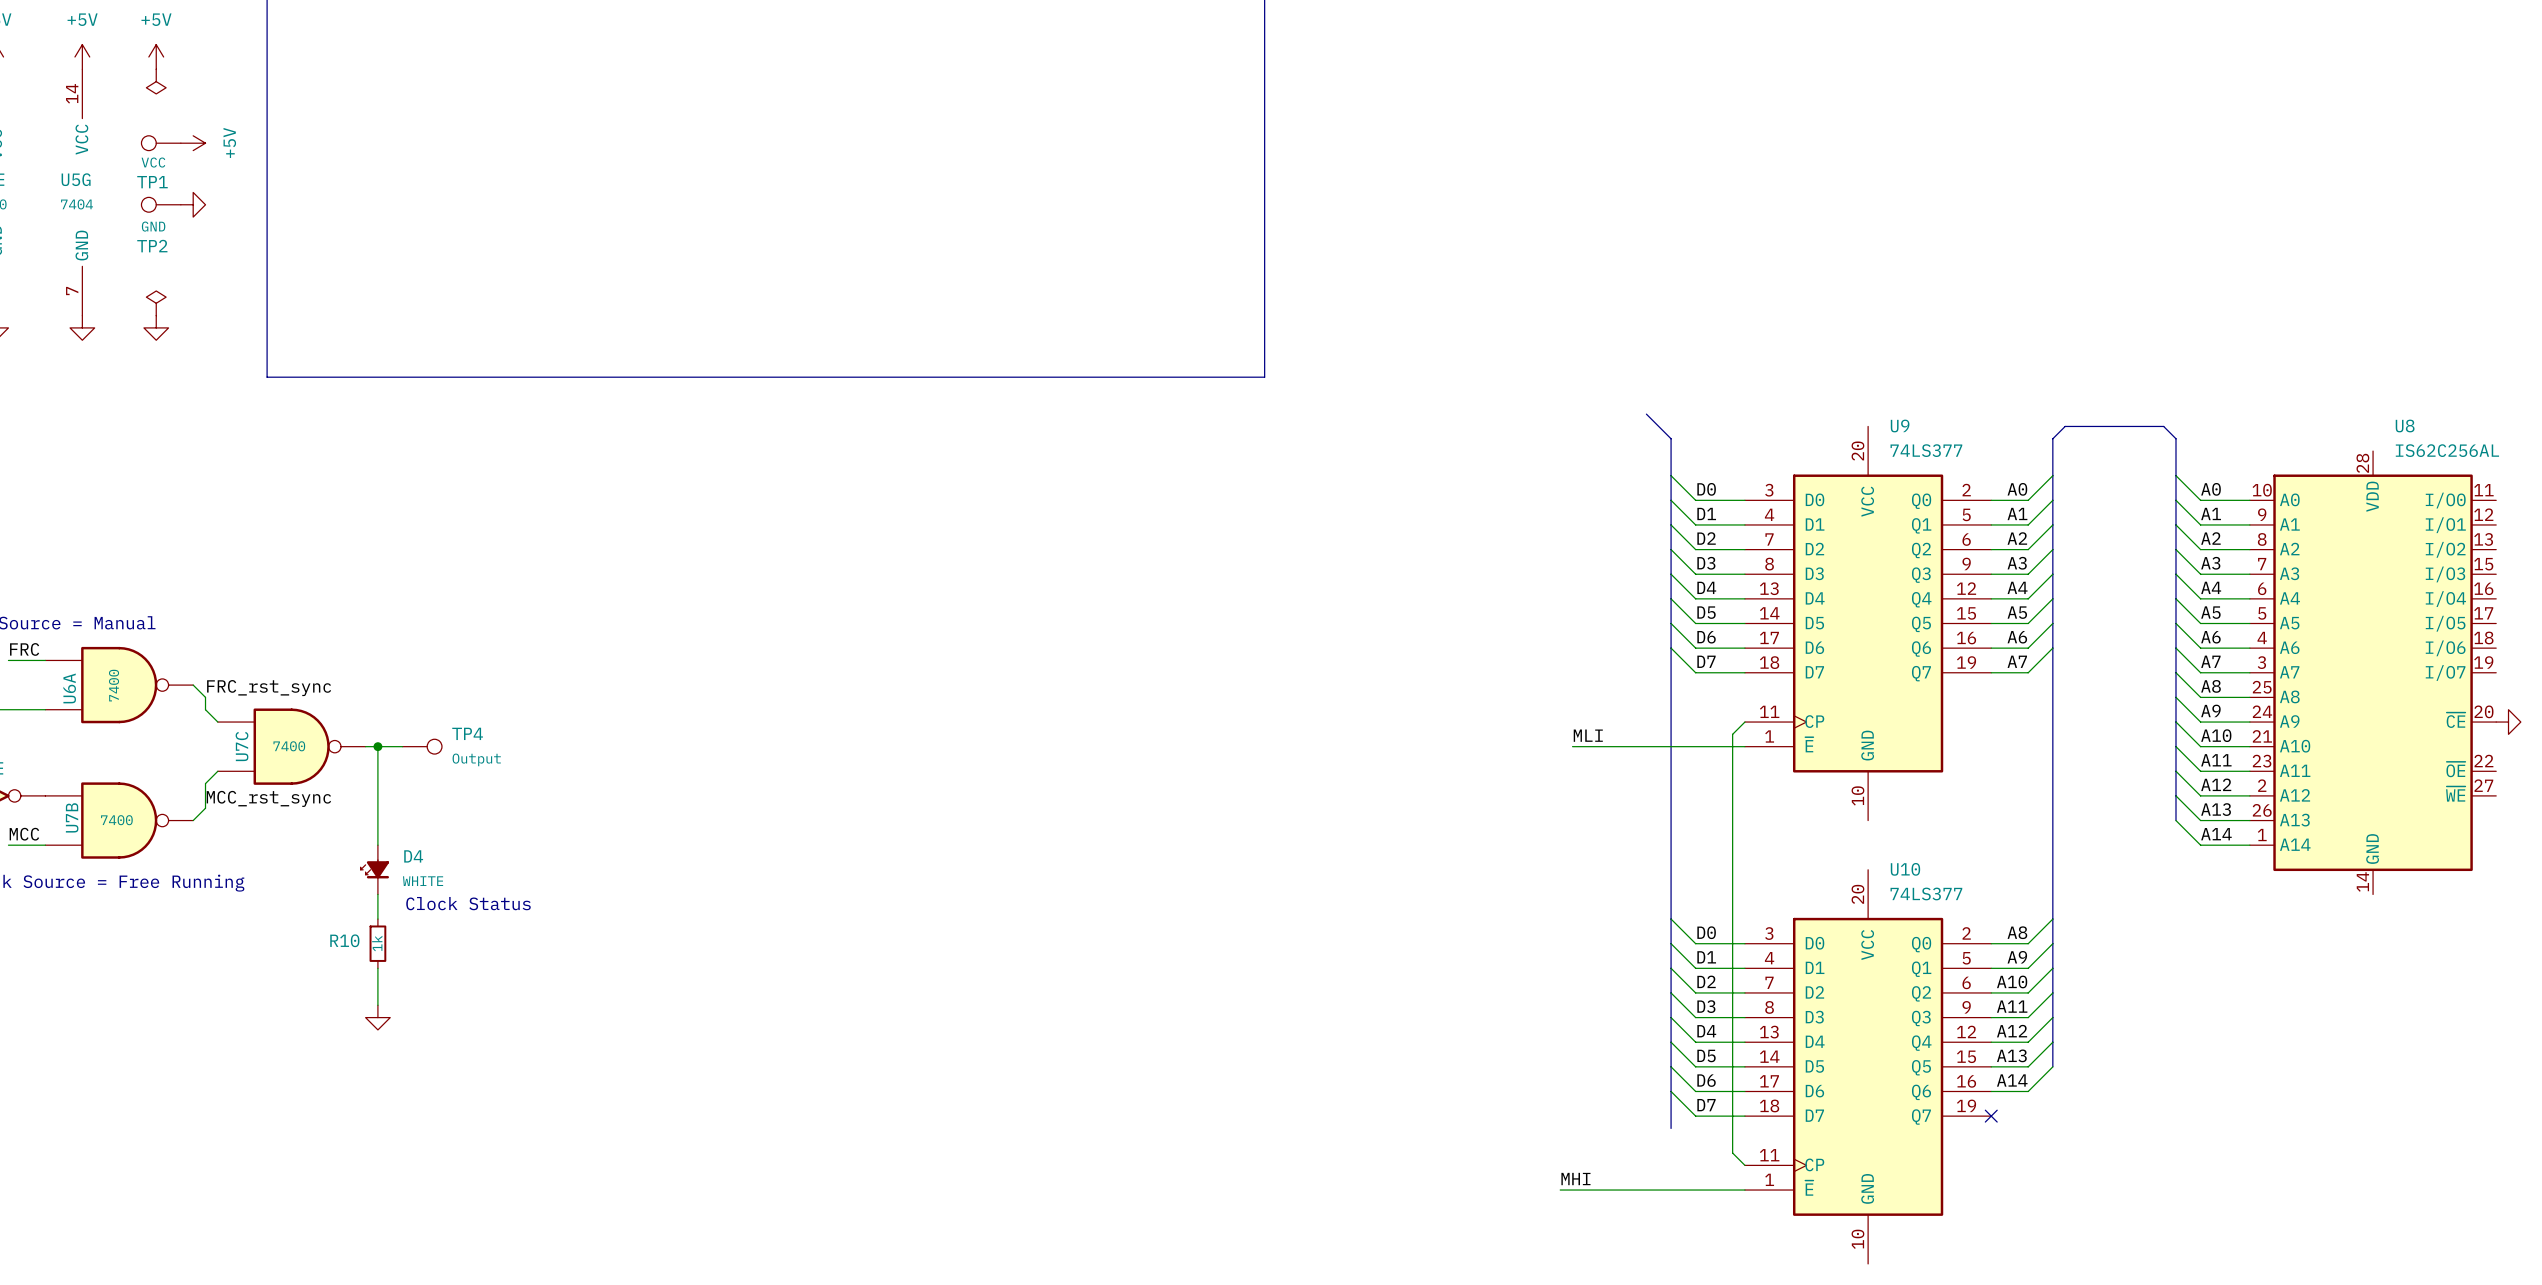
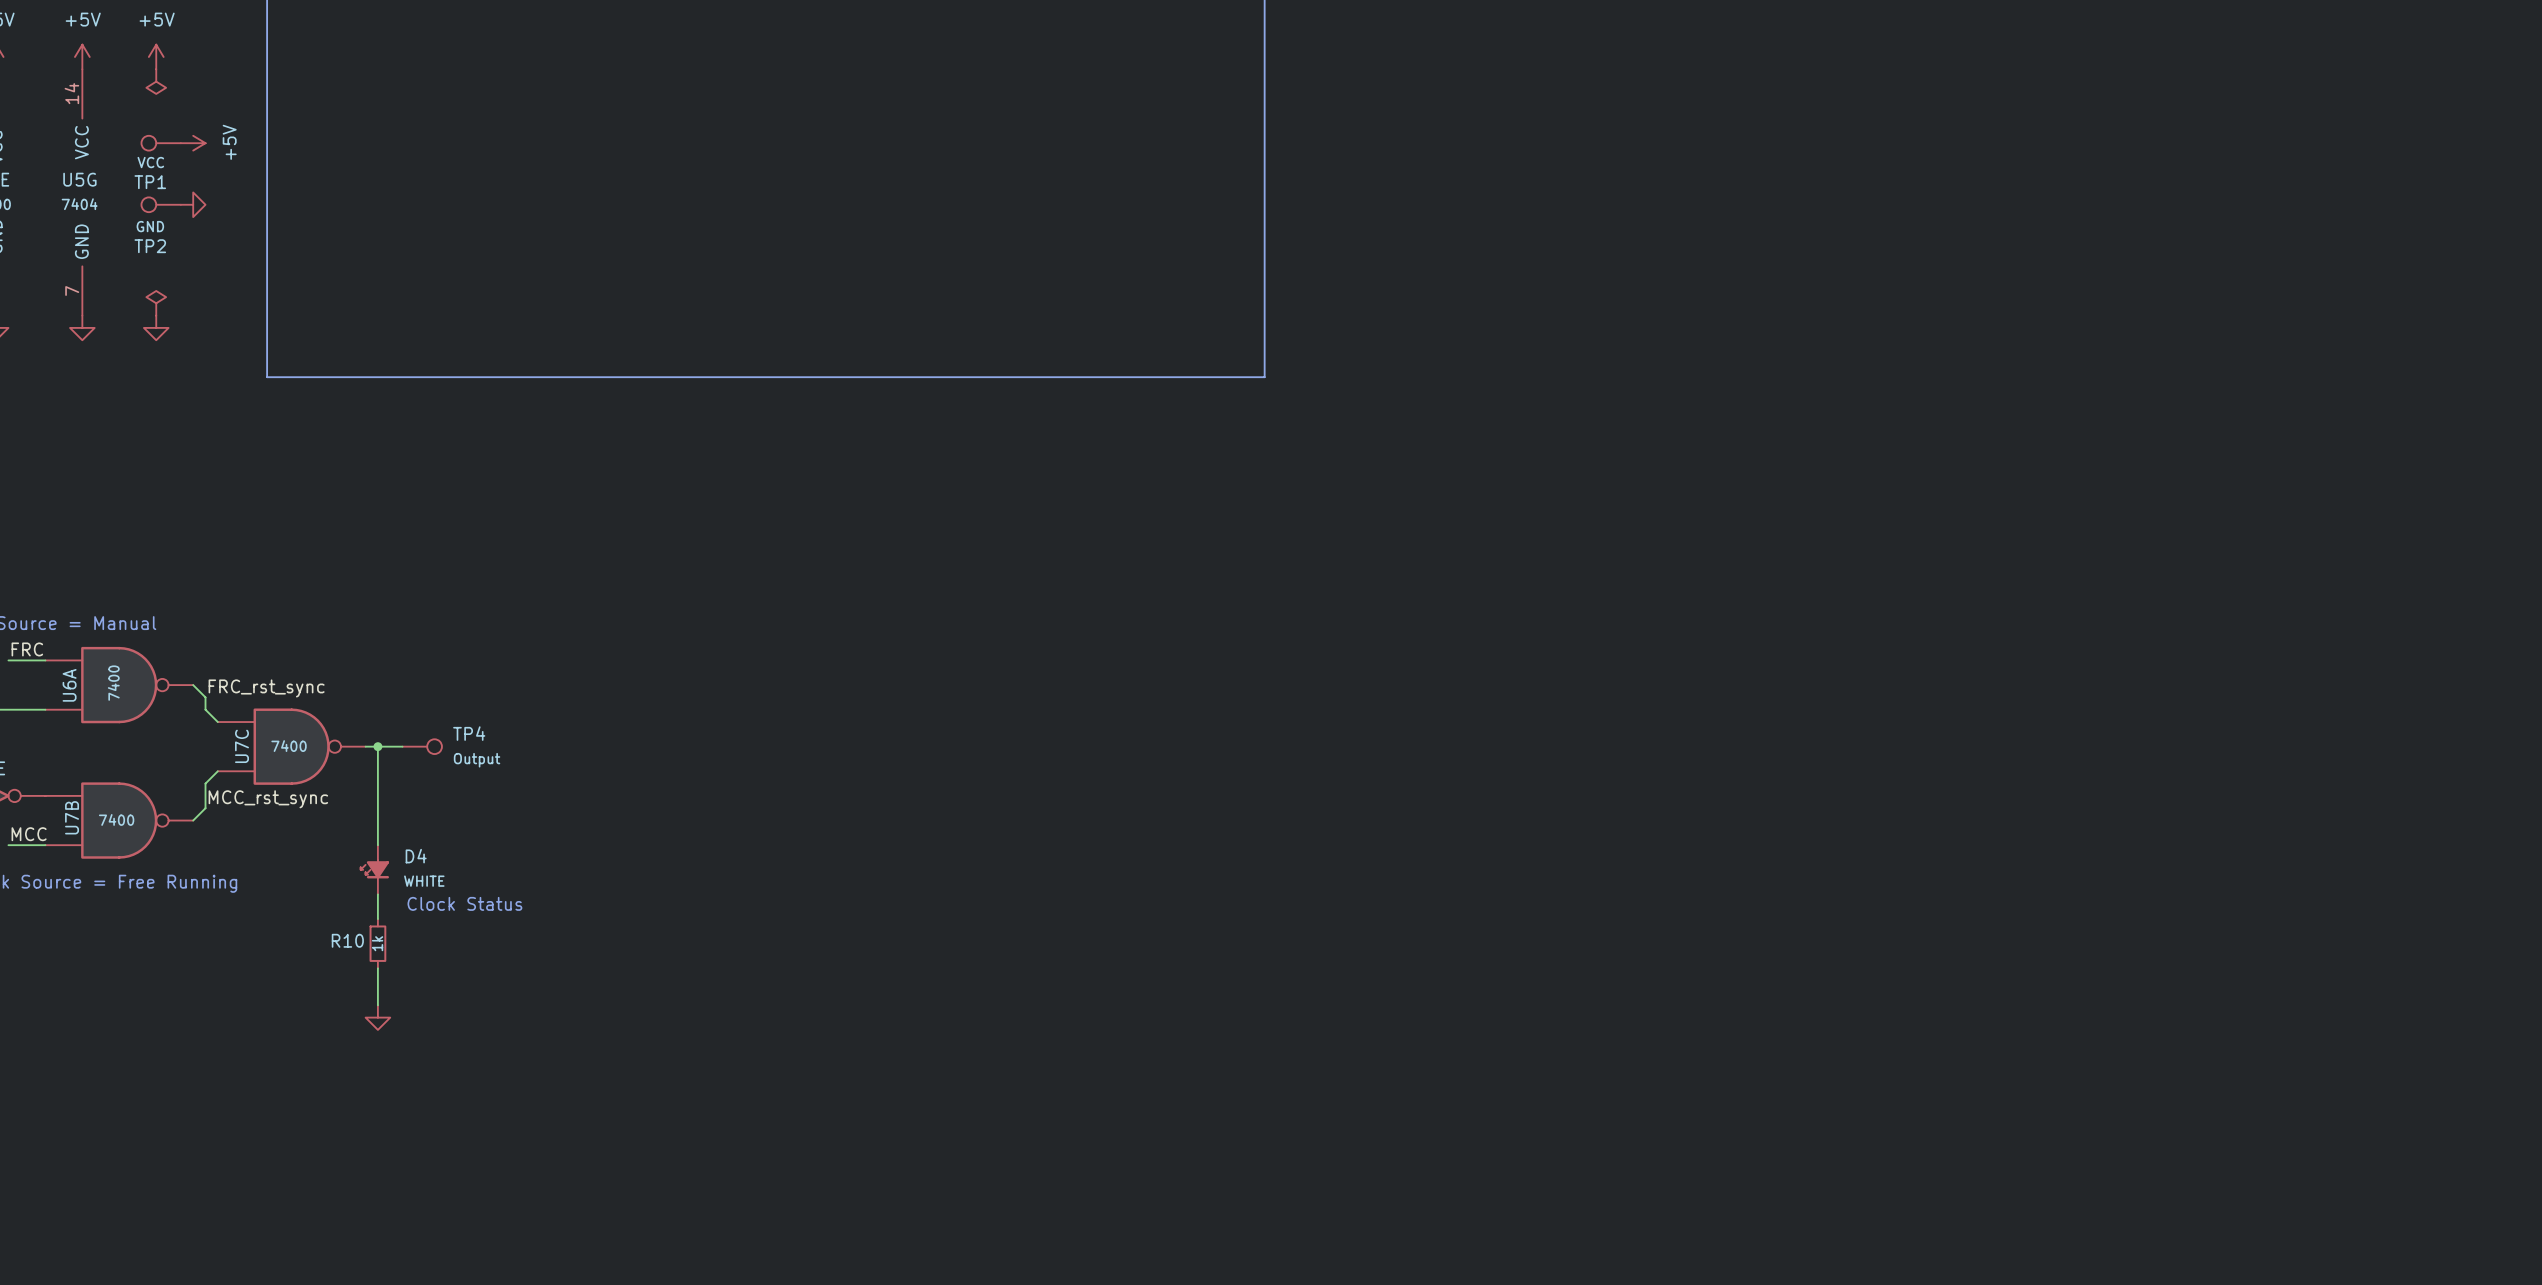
bus: (1646, 414) (1671, 438) (1671, 1128) -> none
wire: (1671, 475) (1695, 500) (1744, 500) -> none
wire: (2052, 475) (2028, 500) (1991, 500) -> none
wire: (2175, 475) (2200, 500) (2249, 500) -> none
label: D0 (1706, 489) -> none
label: A0 (2017, 489) -> none
label: A0 (2210, 489) -> none
wire: (1671, 500) (1695, 524) (1744, 524) -> none
wire: (2052, 500) (2028, 524) (1991, 524) -> none
wire: (2175, 500) (2200, 524) (2249, 524) -> none
label: D1 (1706, 513) -> none
label: A1 (2017, 513) -> none
label: A1 (2211, 513) -> none
wire: (1671, 524) (1695, 549) (1744, 549) -> none
wire: (2052, 524) (2028, 549) (1991, 549) -> none
wire: (2175, 524) (2200, 549) (2249, 549) -> none
label: D2 (1706, 538) -> none
label: A2 (2017, 538) -> none
label: A2 (2210, 538) -> none
wire: (1671, 549) (1695, 574) (1744, 574) -> none
wire: (2052, 549) (2028, 574) (1991, 574) -> none
wire: (2175, 549) (2200, 574) (2249, 574) -> none
label: D3 (1706, 563) -> none
label: A3 (2017, 563) -> none
label: A3 (2210, 563) -> none
wire: (1671, 574) (1695, 598) (1744, 598) -> none
wire: (2052, 574) (2028, 598) (1991, 598) -> none
wire: (2175, 574) (2200, 598) (2249, 598) -> none
label: D4 (1706, 587) -> none
label: A4 (2017, 587) -> none
label: A4 (2211, 587) -> none
wire: (1671, 598) (1695, 623) (1744, 623) -> none
wire: (2052, 598) (2028, 623) (1991, 623) -> none
wire: (2175, 598) (2200, 623) (2249, 623) -> none
label: D5 (1706, 612) -> none
label: A5 (2017, 612) -> none
label: A5 (2210, 612) -> none
wire: (1671, 623) (1695, 648) (1744, 648) -> none
U9: 74LS377 (1868, 623) -> none
wire: (2052, 623) (2028, 648) (1991, 648) -> none
wire: (2175, 623) (2200, 648) (2249, 648) -> none
label: D6 (1706, 637) -> none
label: A6 (2017, 637) -> none
label: A6 (2210, 637) -> none
wire: (1671, 648) (1695, 672) (1744, 672) -> none
wire: (2052, 648) (2028, 672) (1991, 672) -> none
wire: (2175, 648) (2200, 672) (2249, 672) -> none
label: D7 (1706, 661) -> none
label: A7 (2017, 661) -> none
label: A7 (2210, 661) -> none
wire: (2175, 672) (2200, 697) (2249, 697) -> none
U8: IS62C256AL (2373, 672) -> none
label: A8 (2211, 686) -> none
wire: (2175, 697) (2200, 722) (2249, 722) -> none
label: A9 (2210, 710) -> none
wire: (1744, 722) (1732, 734) (1732, 1153) (1744, 1165) -> none
wire: (2175, 722) (2200, 746) (2249, 746) -> none
power symbol: (2508, 722) -> none
label: MLI (1588, 735) -> none
label: A10 (2216, 735) -> none
wire: (1572, 746) (1744, 746) -> none
wire: (2175, 746) (2200, 771) (2249, 771) -> none
label: A11 (2216, 760) -> none
wire: (2175, 771) (2200, 795) (2249, 795) -> none
label: A12 (2216, 784) -> none
wire: (2175, 795) (2200, 820) (2249, 820) -> none
label: A13 (2216, 809) -> none
wire: (2175, 820) (2200, 845) (2249, 845) -> none
bus: (2175, 820) (2175, 438) (2163, 426) (2065, 426) (2052, 438) (2052, 1066) -> none
label: A14 (2216, 834) -> none
wire: (1671, 919) (1695, 943) (1744, 943) -> none
wire: (2052, 919) (2028, 943) (1991, 943) -> none
label: D0 (1706, 932) -> none
label: A8 (2017, 932) -> none
wire: (1671, 943) (1695, 968) (1744, 968) -> none
wire: (2052, 943) (2028, 968) (1991, 968) -> none
label: D1 (1706, 957) -> none
label: A9 (2017, 957) -> none
wire: (1671, 968) (1695, 992) (1744, 992) -> none
wire: (2052, 968) (2028, 992) (1991, 992) -> none
label: D2 (1706, 981) -> none
label: A10 (2012, 981) -> none
wire: (1671, 992) (1695, 1017) (1744, 1017) -> none
wire: (2052, 992) (2028, 1017) (1991, 1017) -> none
label: D3 (1706, 1006) -> none
label: A11 (2012, 1006) -> none
wire: (1671, 1017) (1695, 1042) (1744, 1042) -> none
wire: (2052, 1017) (2028, 1042) (1991, 1042) -> none
label: D4 (1706, 1031) -> none
label: A12 (2012, 1031) -> none
wire: (1671, 1042) (1695, 1066) (1744, 1066) -> none
wire: (2052, 1042) (2028, 1066) (1991, 1066) -> none
label: D5 (1706, 1055) -> none
label: A13 (2011, 1055) -> none
wire: (1671, 1066) (1695, 1091) (1744, 1091) -> none
U10: 74LS377 (1868, 1066) -> none
wire: (2052, 1066) (2028, 1091) (1991, 1091) -> none
label: D6 (1706, 1080) -> none
label: A14 (2012, 1080) -> none
wire: (1671, 1091) (1695, 1116) (1744, 1116) -> none
label: D7 (1706, 1105) -> none
no-connect mark: (1991, 1116) -> none
label: MHI (1575, 1179) -> none
wire: (1560, 1190) (1744, 1190) -> none

